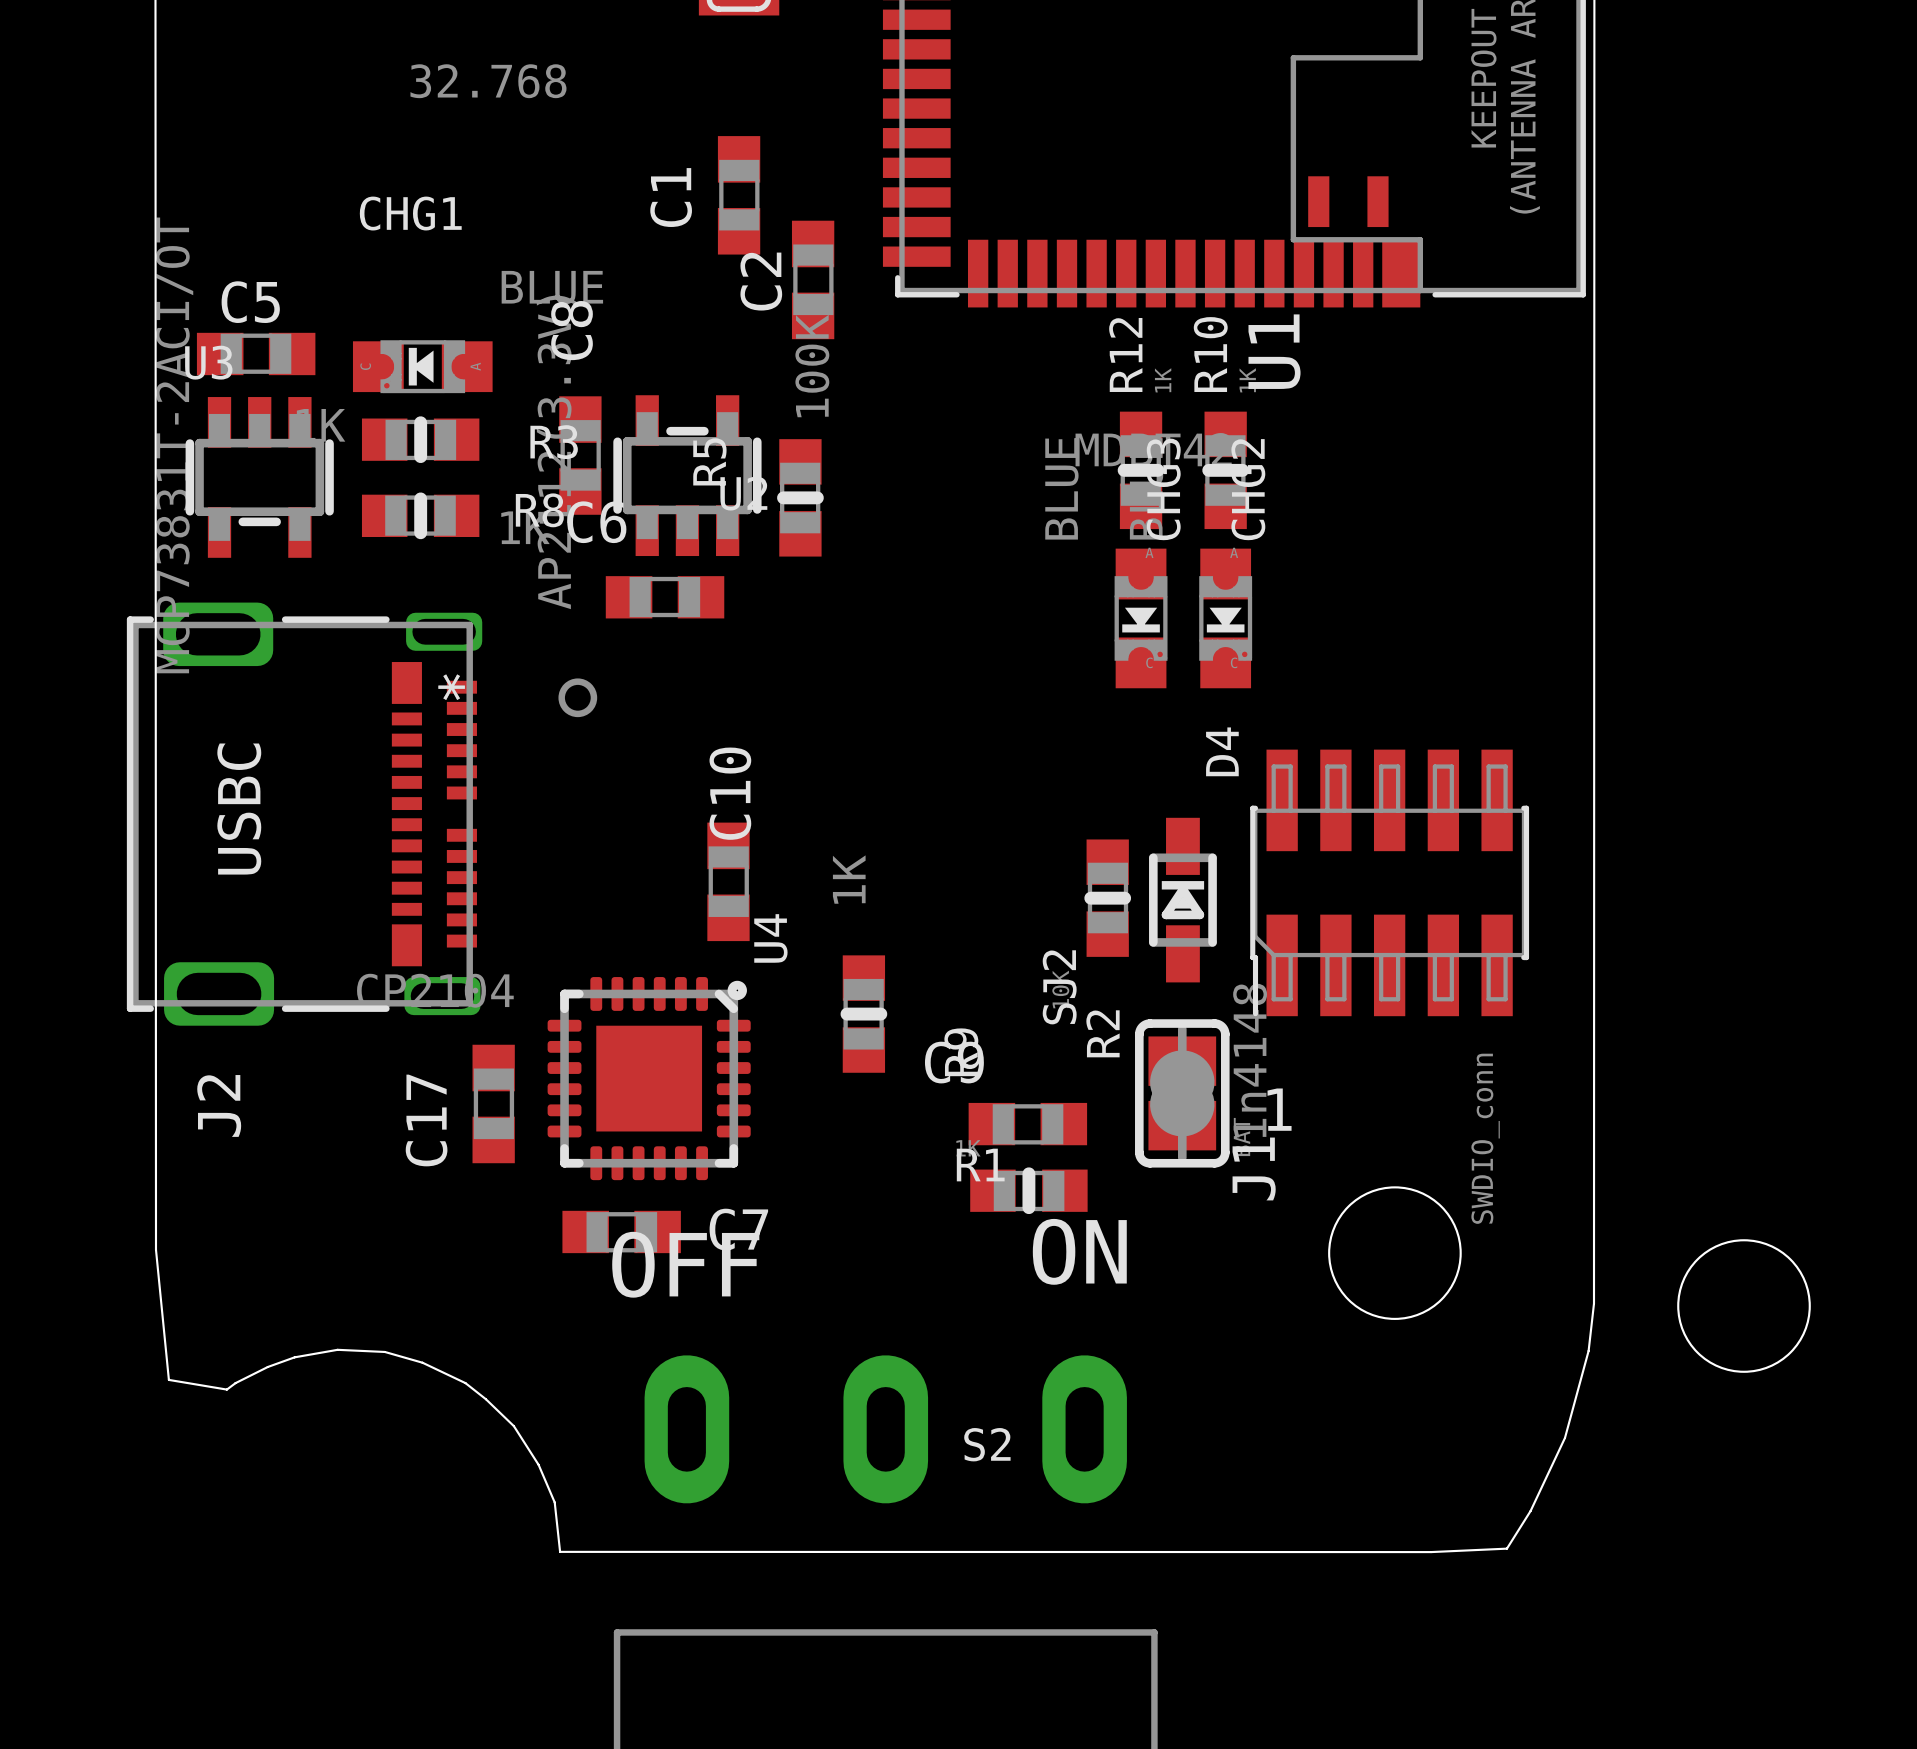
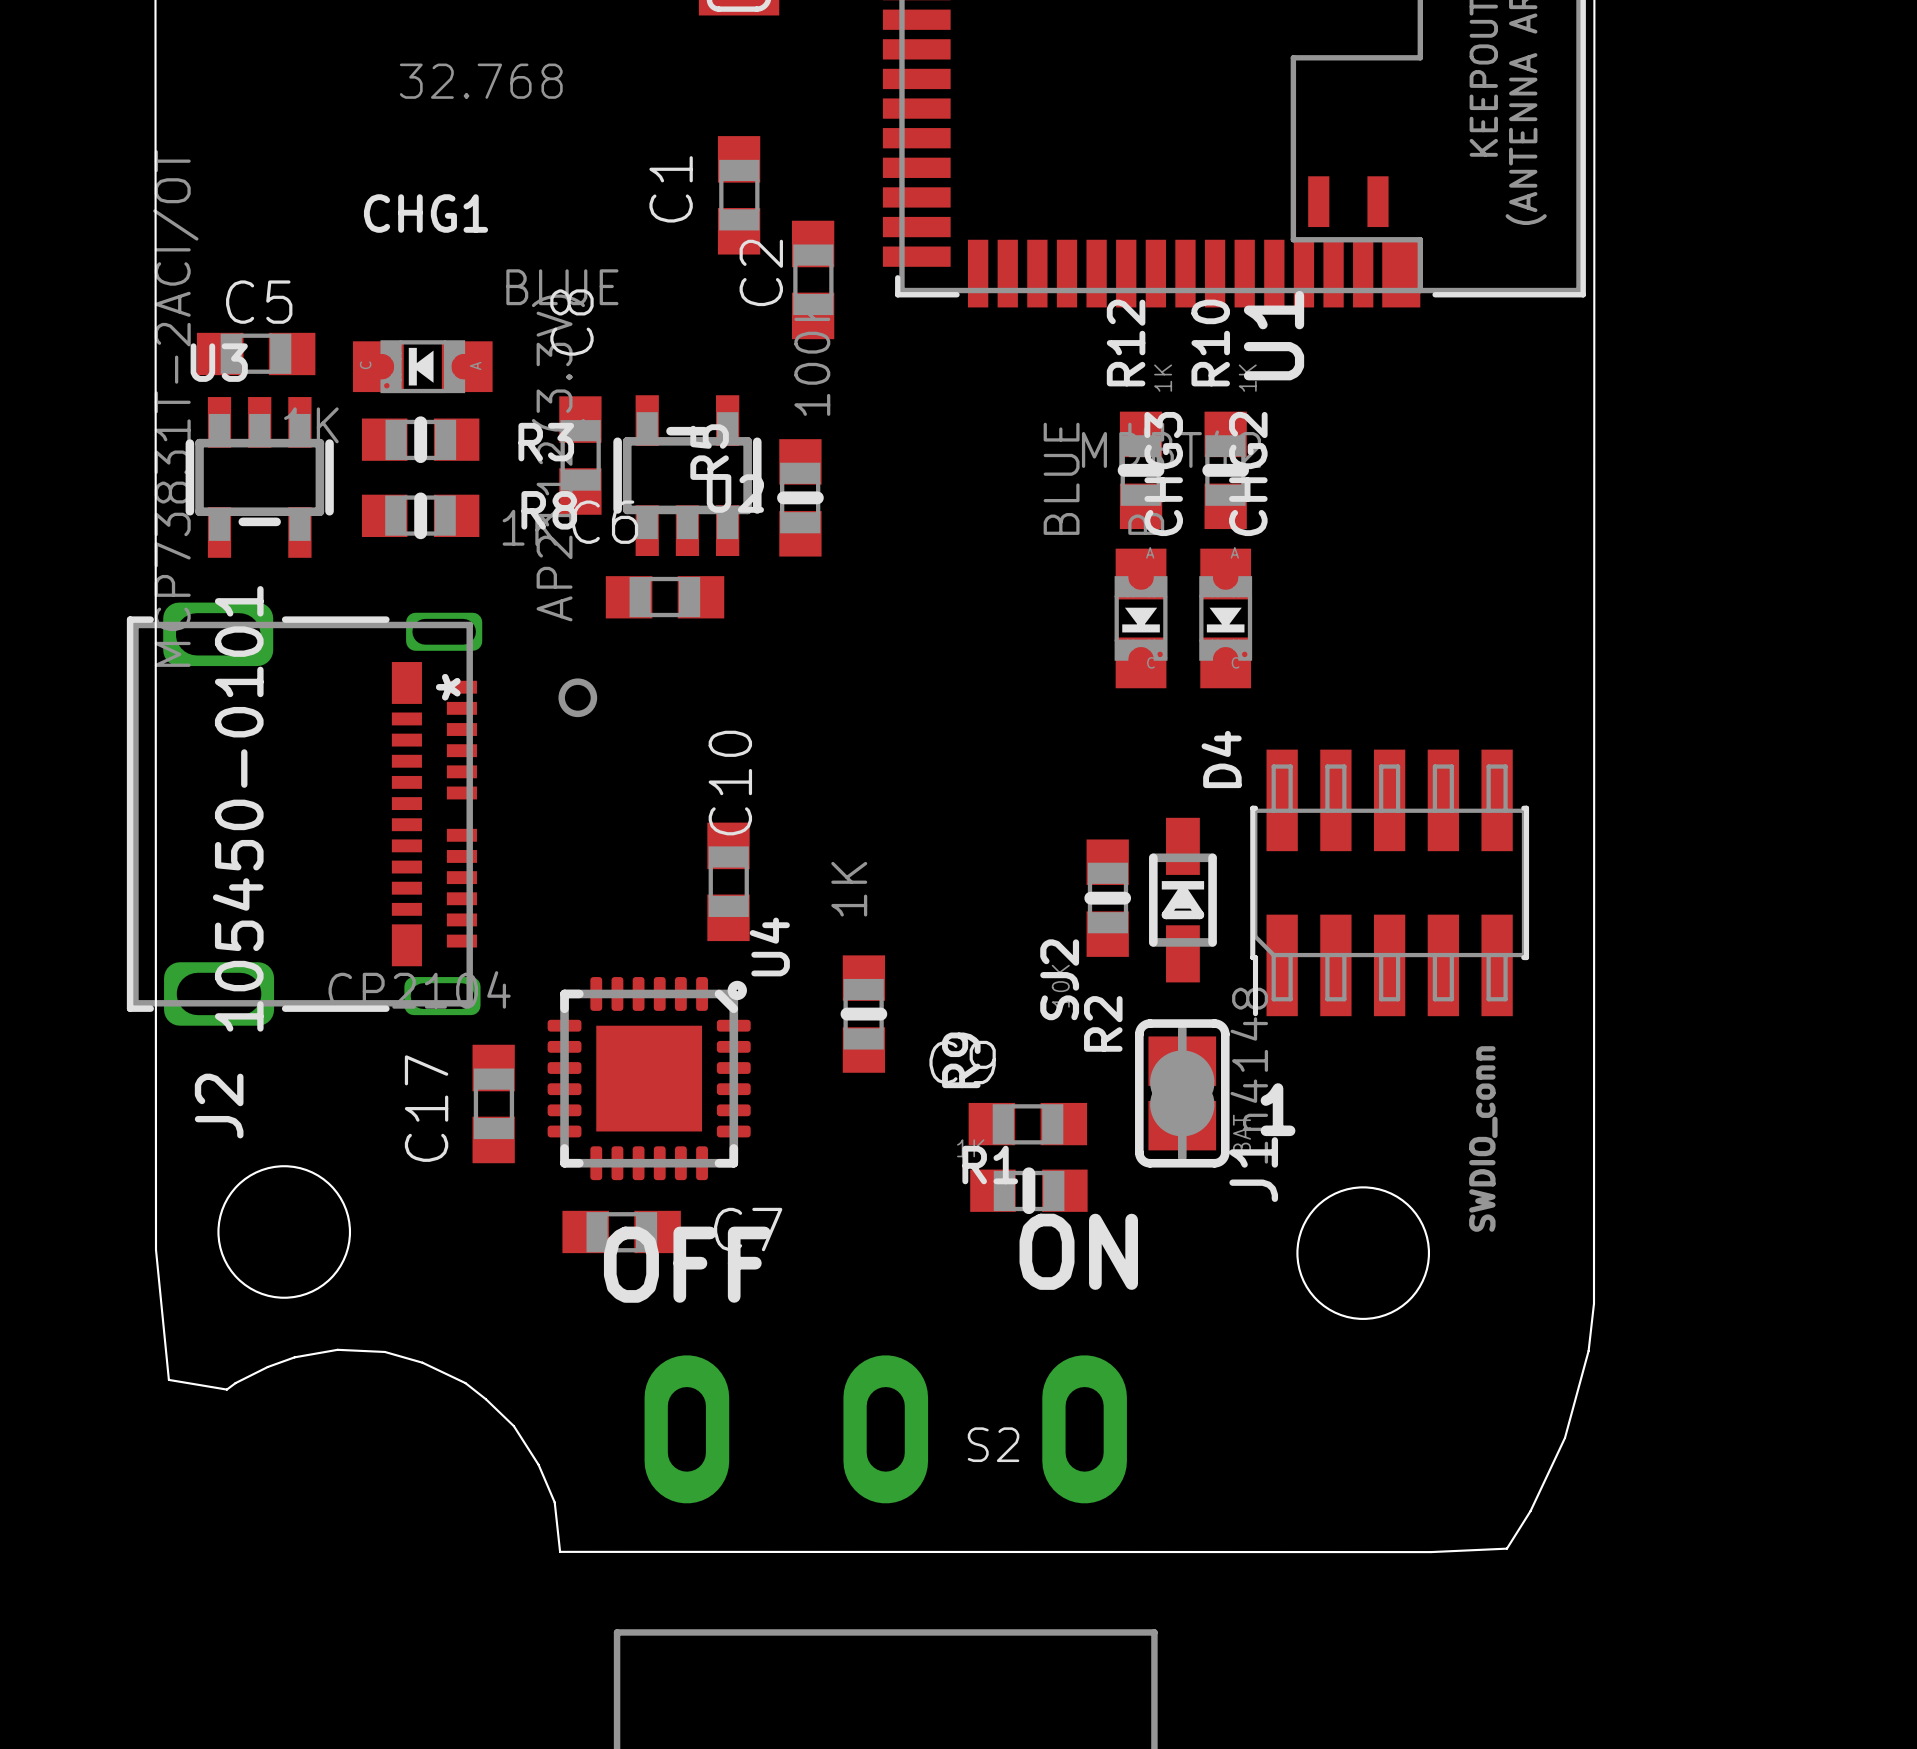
J2 value: USBC (239, 809) -> 105450-0101 (238, 808)
round board edge: none -> [217, 1165, 352, 1299]
round board edge: [1677, 1239, 1811, 1373] -> none
round board edge position: (1394, 1253) -> (1363, 1253)

